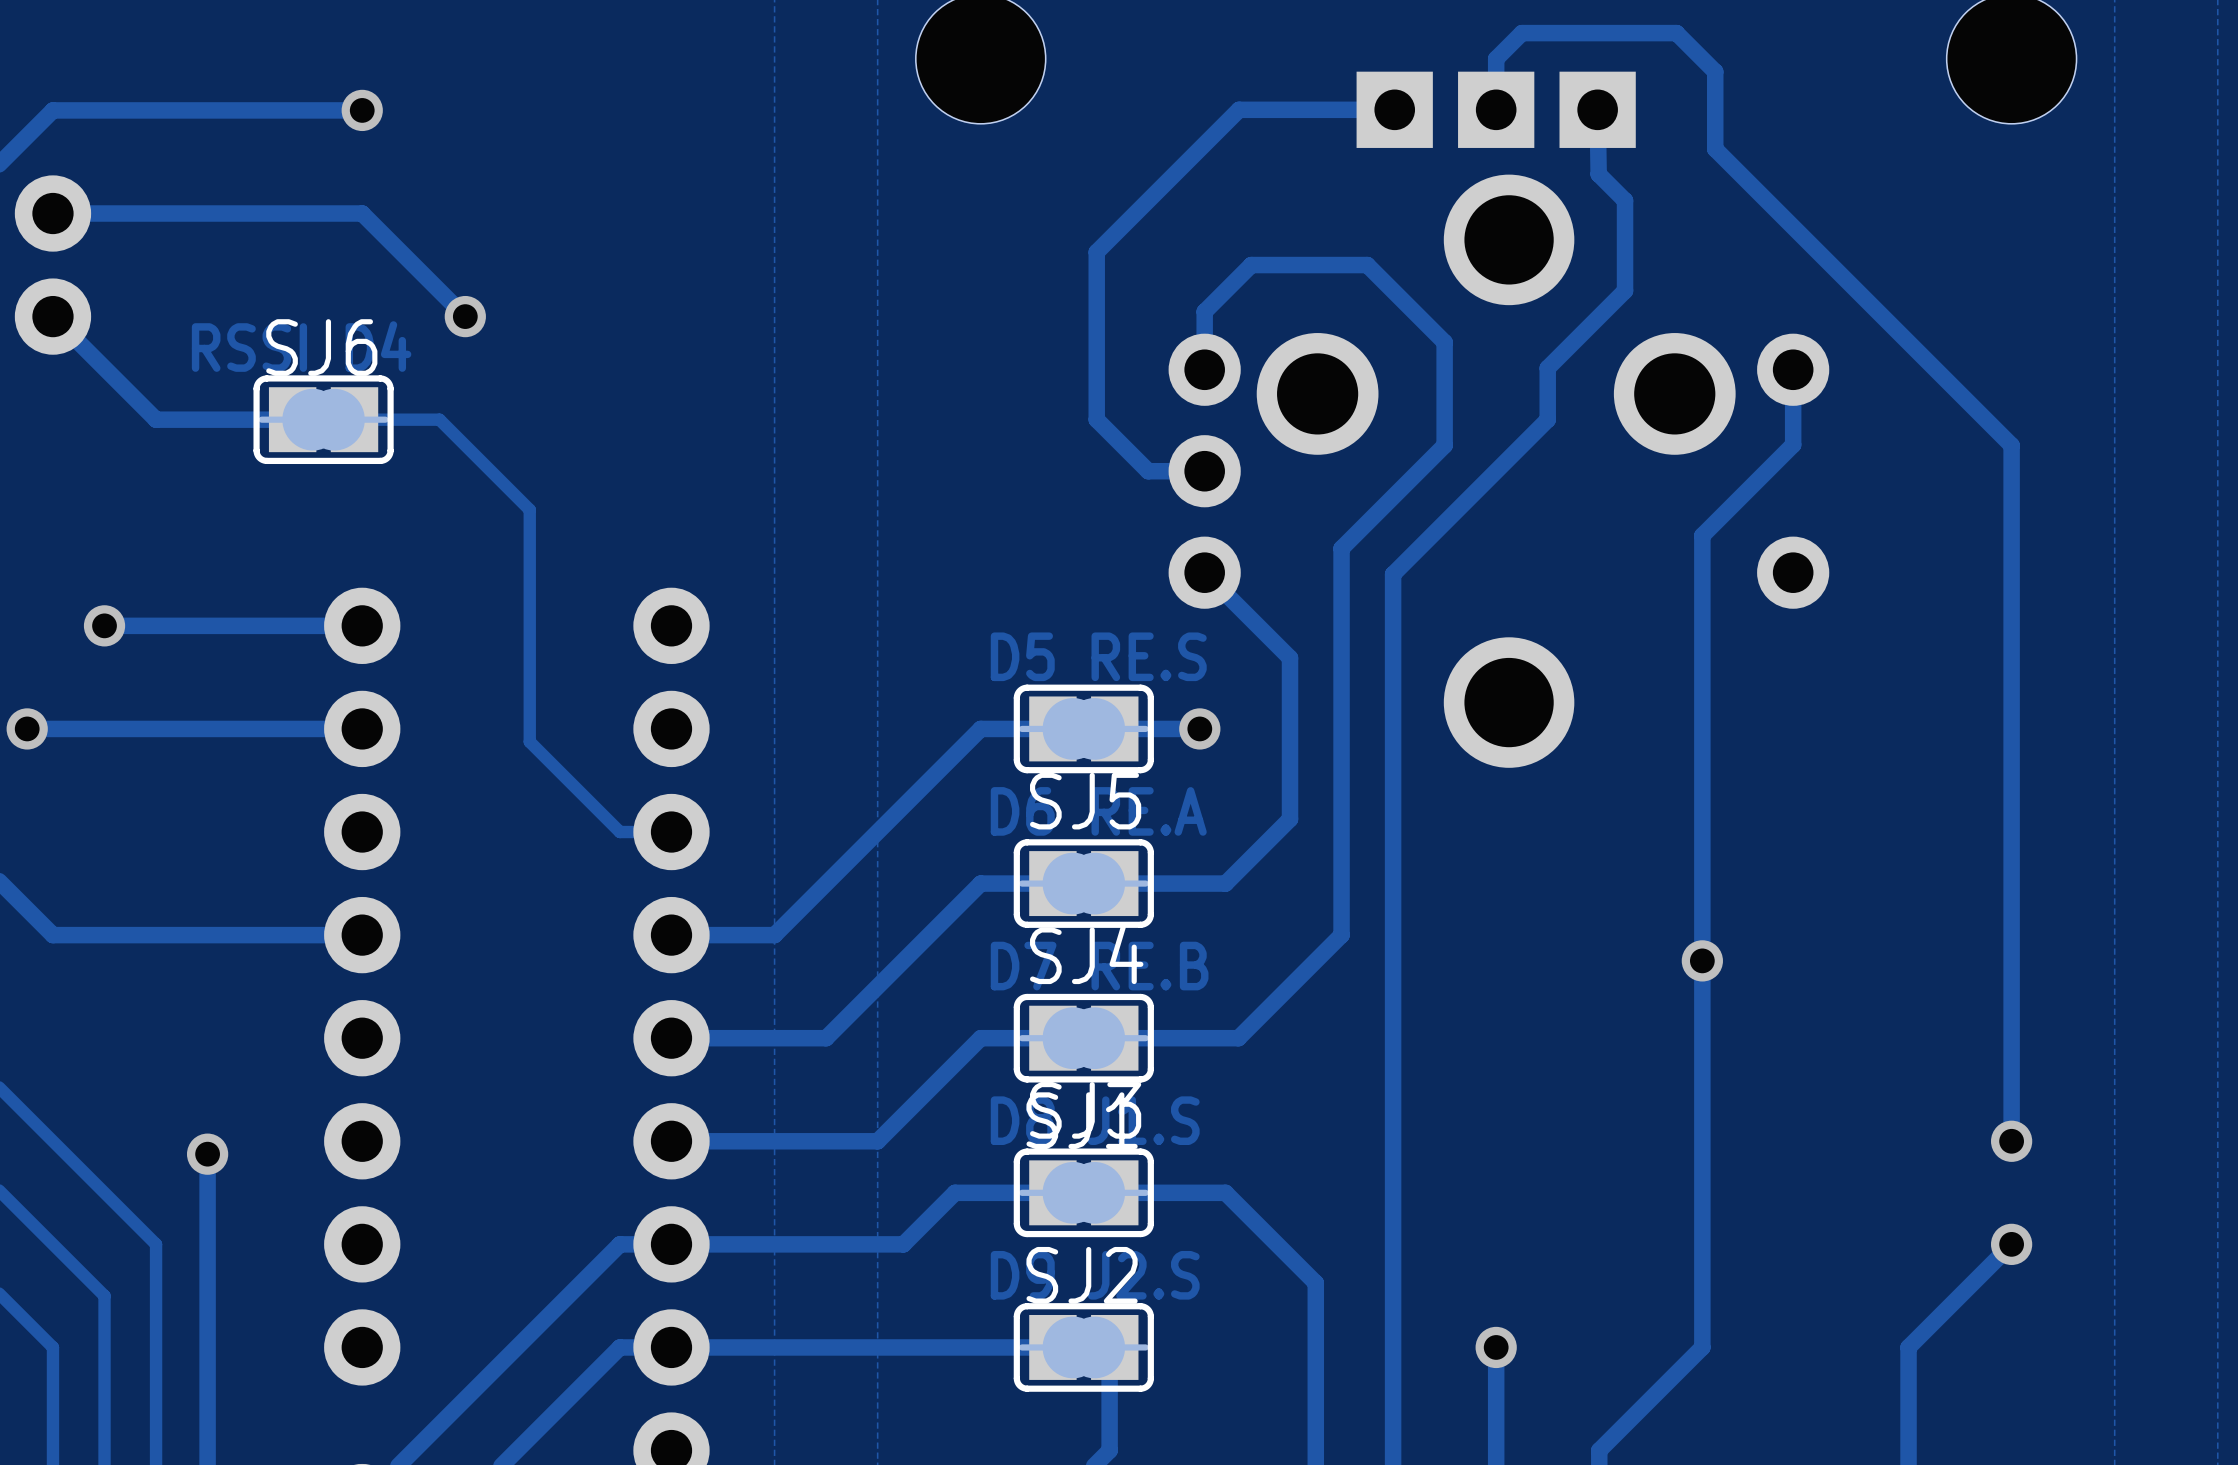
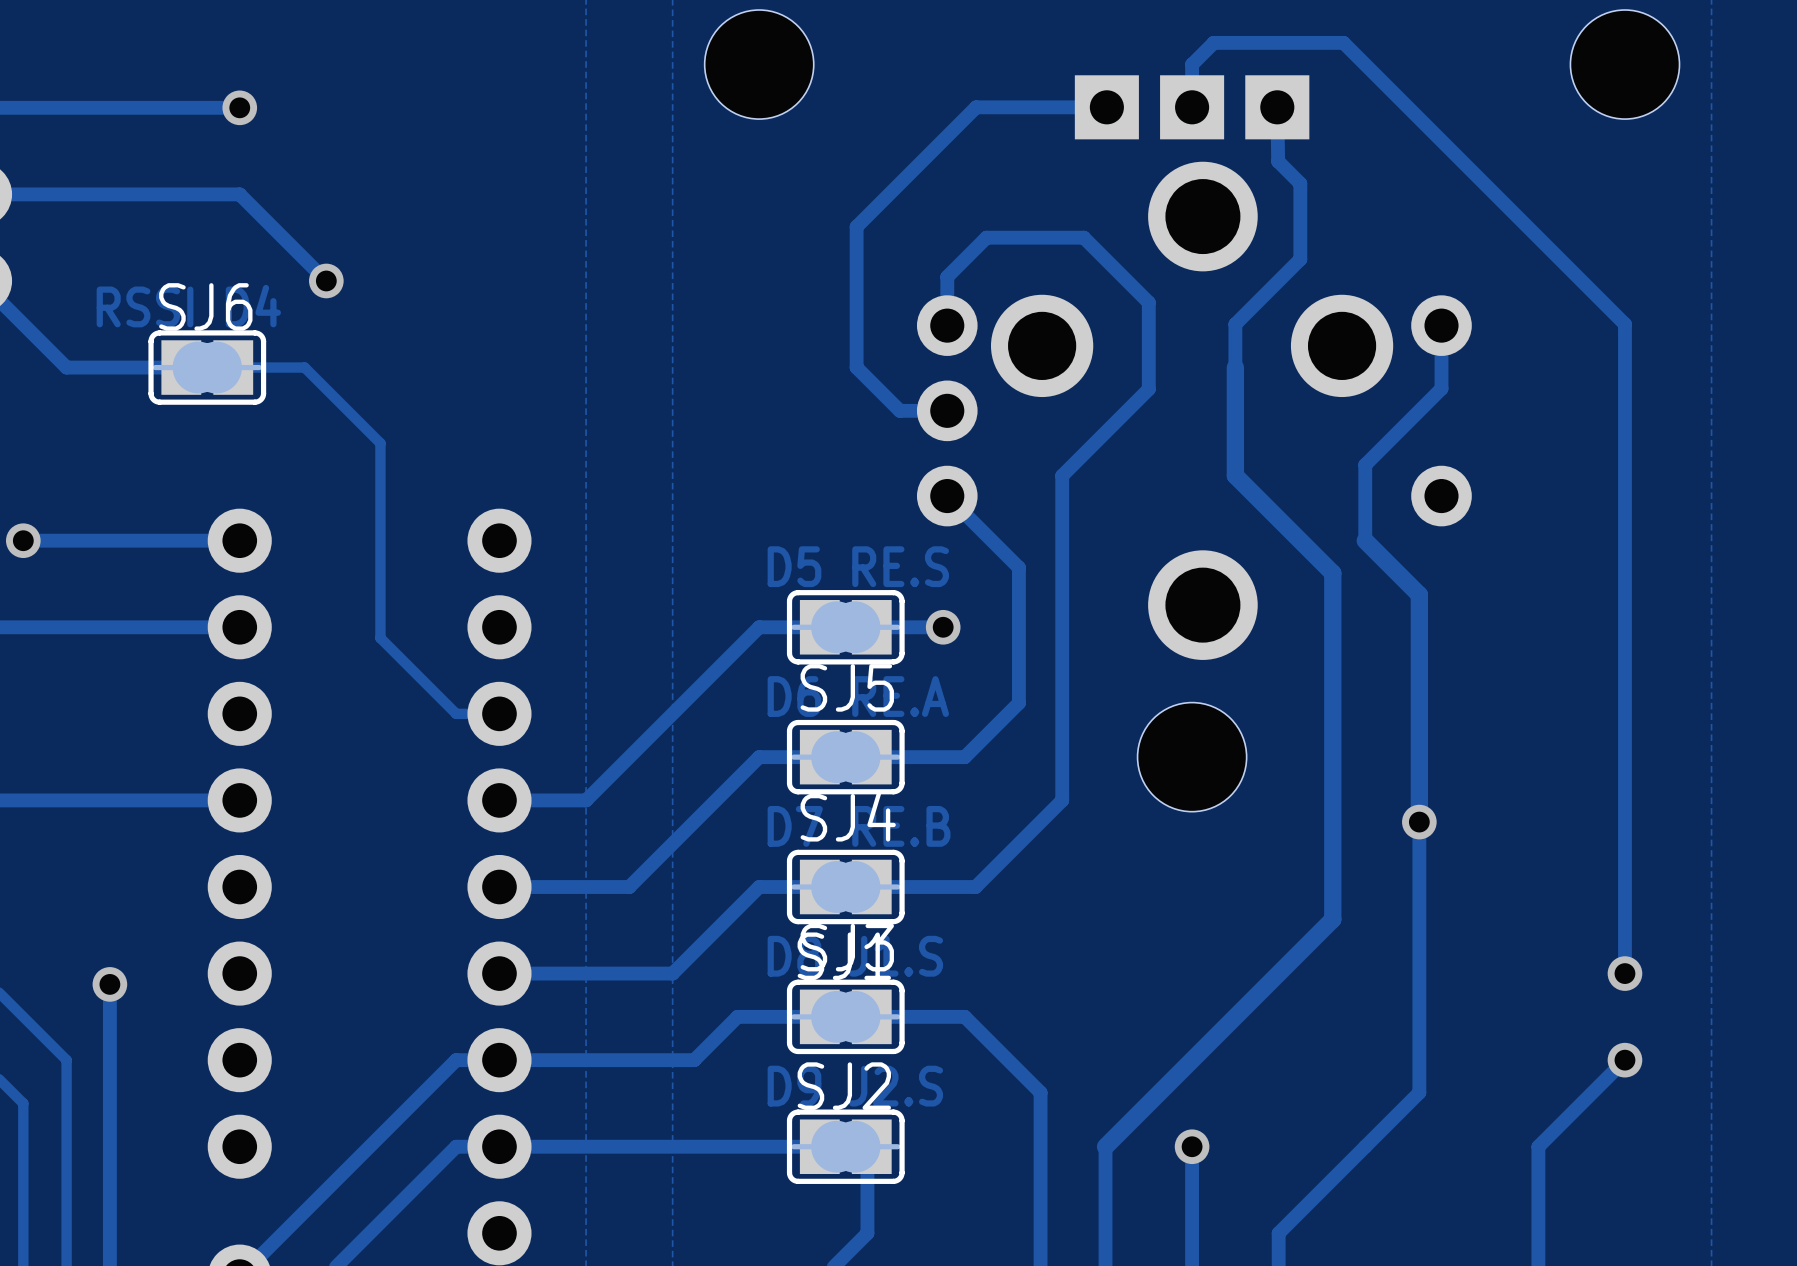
track: (1715, 71) (1715, 149) (2011, 445) -> (1376, 75) (1624, 324) (1624, 389)
track: (1547, 419) (1393, 574) (1393, 1347) -> (1235, 367) (1235, 475) (1332, 573) (1332, 919) (1105, 1146)
track: (1702, 625) (1702, 1347) -> (1365, 540) (1419, 594) (1419, 1092) (1365, 1146)
hole: none -> (1192, 757)
via position: (1702, 960) -> (1419, 822)

